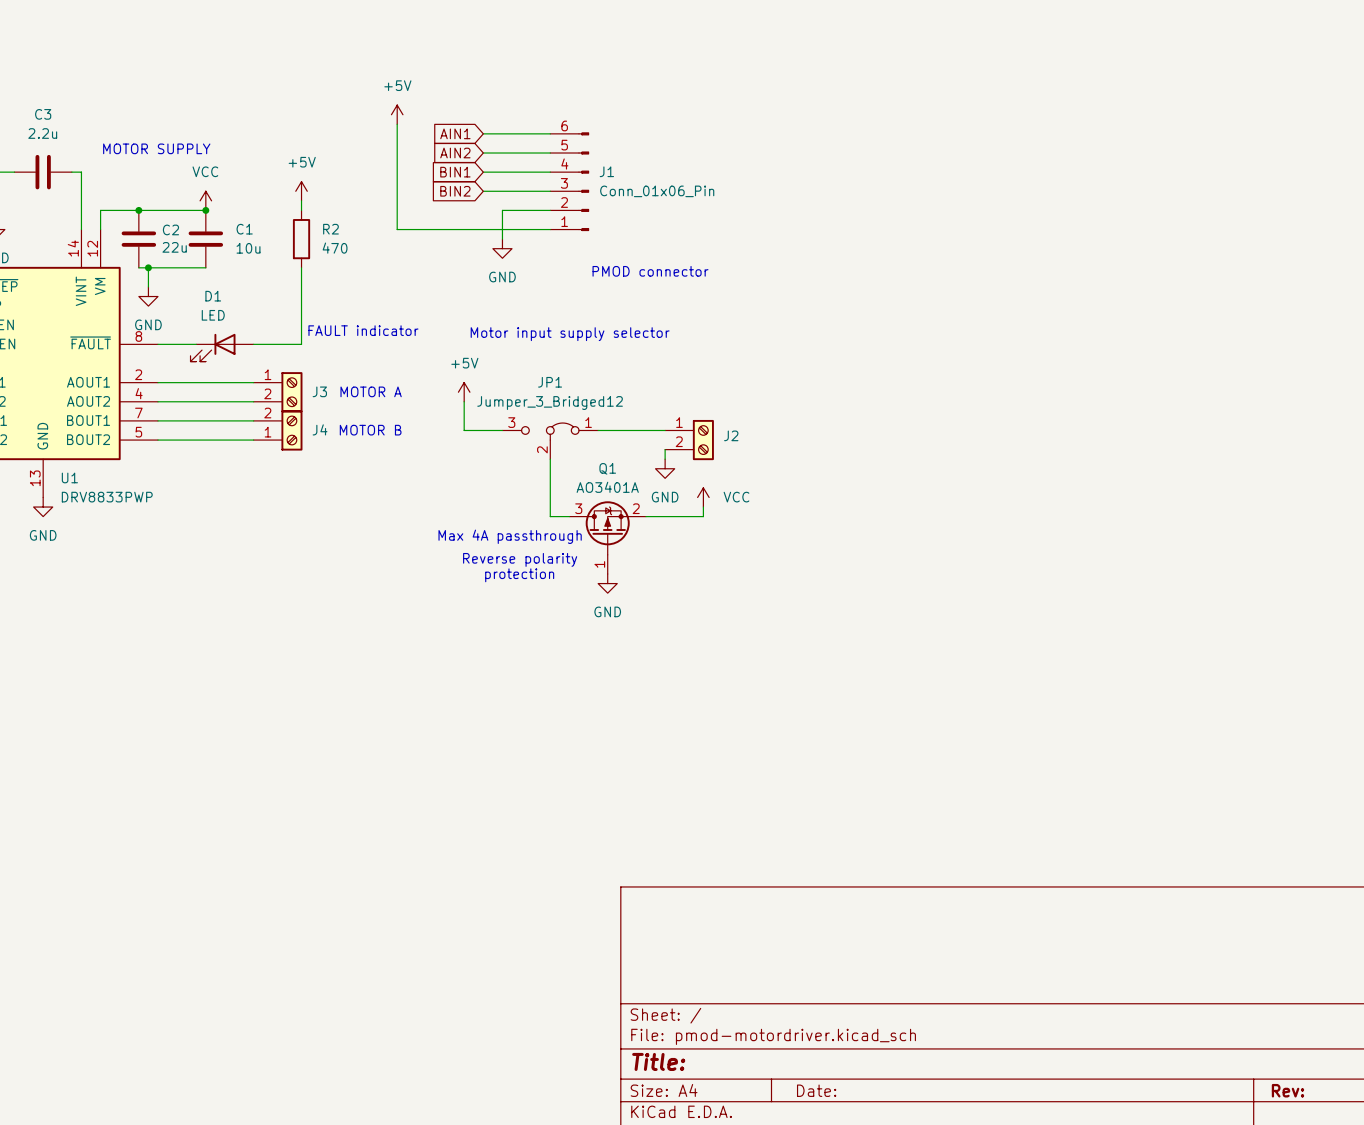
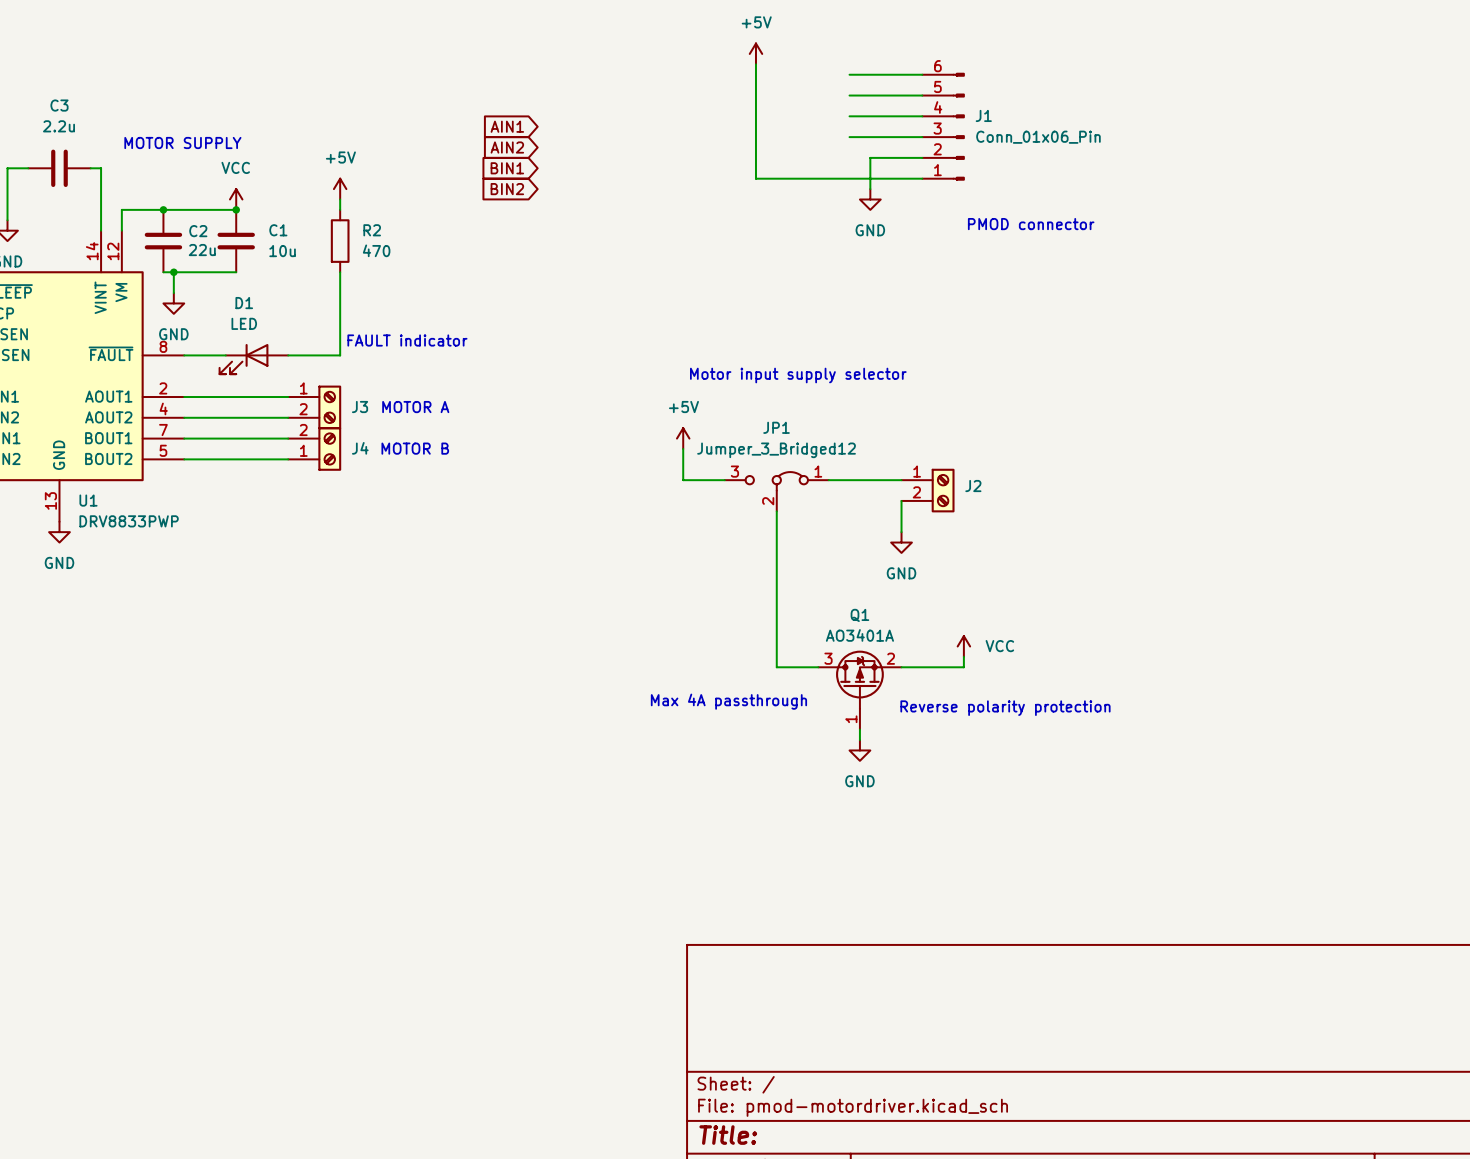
power symbol: none -> +5V (755, 53)
wire: none -> (755, 64) (755, 178) (922, 178)
wire: none -> (849, 74) (922, 74)
wire: none -> (849, 95) (922, 95)
power symbol: +5V (397, 114) -> none
wire: (397, 124) (397, 229) (550, 229) -> none
wire: none -> (849, 116) (922, 116)
wire: (483, 133) (550, 133) -> none
wire: none -> (849, 137) (922, 137)
wire: (483, 153) (550, 153) -> none
wire: none -> (922, 157) (870, 157) (870, 189)
wire: (483, 172) (550, 172) -> none
J1 position: (569, 181) -> (943, 126)
wire: (483, 191) (550, 191) -> none
power symbol: none -> GND (870, 199)
wire: (550, 210) (502, 210) (502, 239) -> none
text: none -> PMOD connector (1031, 224)
power symbol: GND (502, 248) -> none
text: PMOD connector (650, 271) -> none
text position: Motor input supply selector (570, 334) -> Motor input supply selector (798, 375)
power symbol position: +5V (464, 392) -> +5V (683, 438)
wire: (464, 401) (464, 430) (502, 430) -> (683, 448) (683, 480) (724, 480)
wire: (598, 430) (665, 430) -> (828, 480) (901, 480)
J2 position: (689, 440) -> (928, 490)
JP1 position: (550, 441) -> (776, 491)
wire: (665, 449) (665, 459) -> none
wire: (550, 459) (550, 516) (569, 516) -> none
power symbol: GND (665, 468) -> none
wire: none -> (901, 500) (901, 532)
power symbol: VCC (703, 497) -> none
wire: (645, 516) (703, 516) -> (818, 667) (776, 667) (776, 542)
power symbol: none -> GND (901, 542)
text: Max 4A passthrough (510, 536) -> none
Q1 position: (607, 537) -> (859, 690)
text: Reverse polarity (520, 559) -> none
text: protection (519, 575) -> none
power symbol: GND (607, 583) -> none
power symbol: none -> VCC (963, 646)
wire: none -> (963, 656) (963, 667) (901, 667)
text: none -> Max 4A passthrough (728, 701)
text: none -> Reverse polarity protection (1005, 708)
wire: none -> (859, 729) (859, 740)
power symbol: none -> GND (859, 750)

